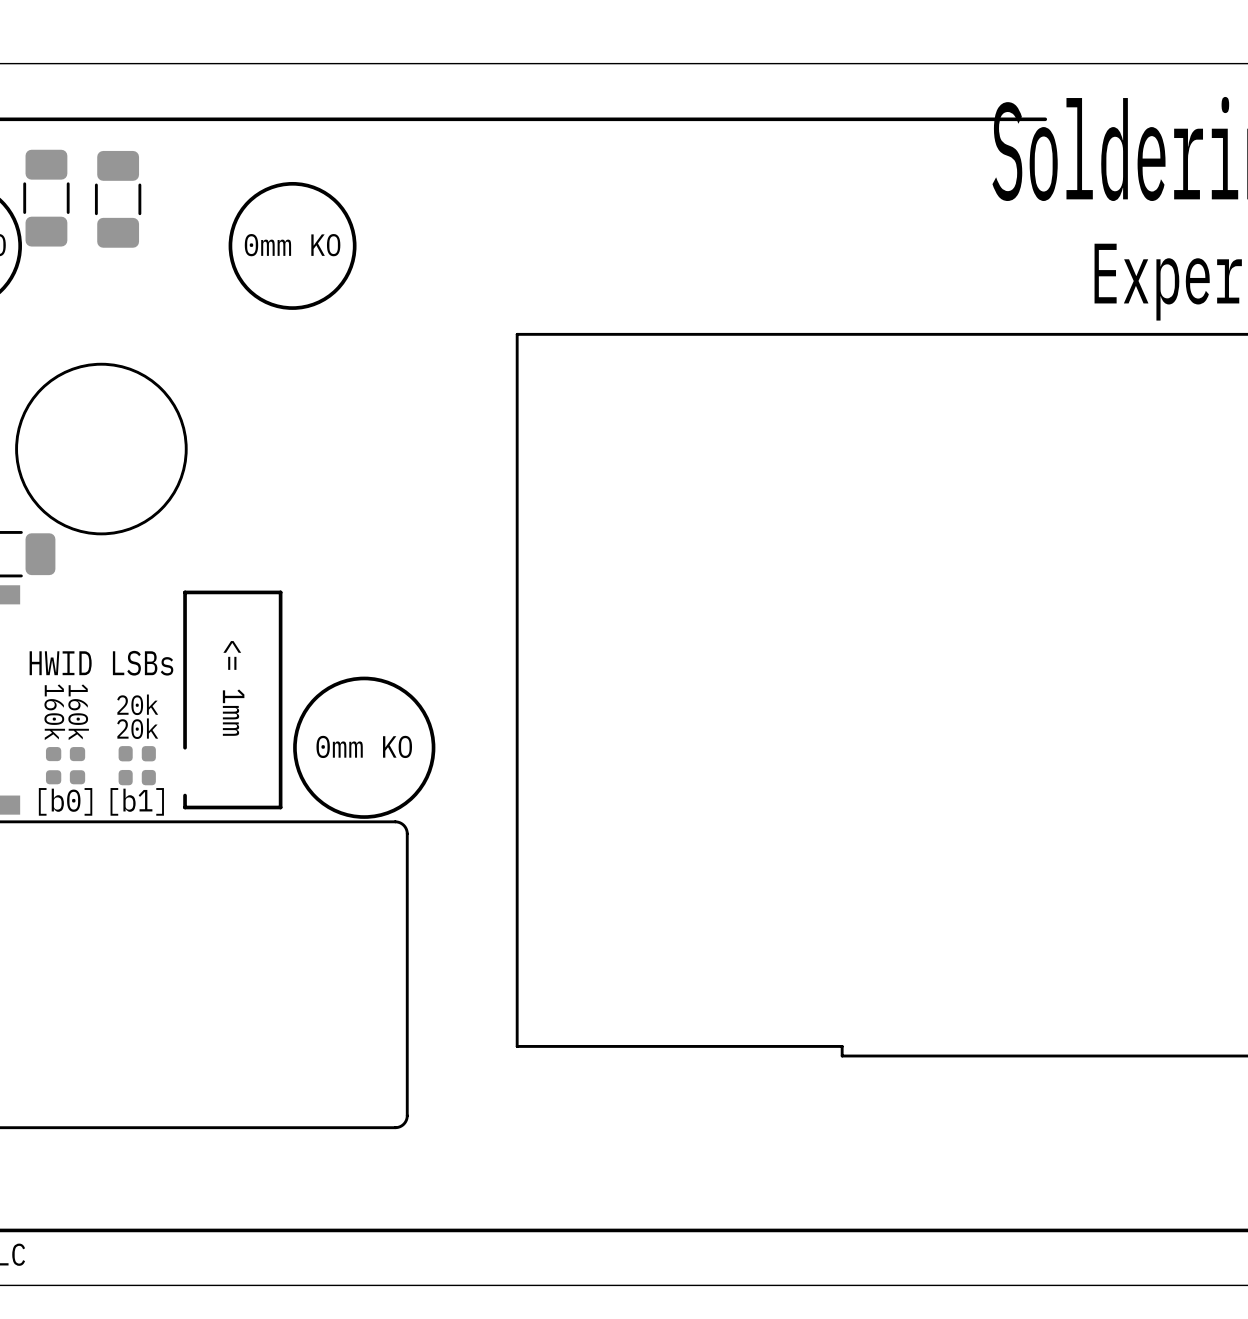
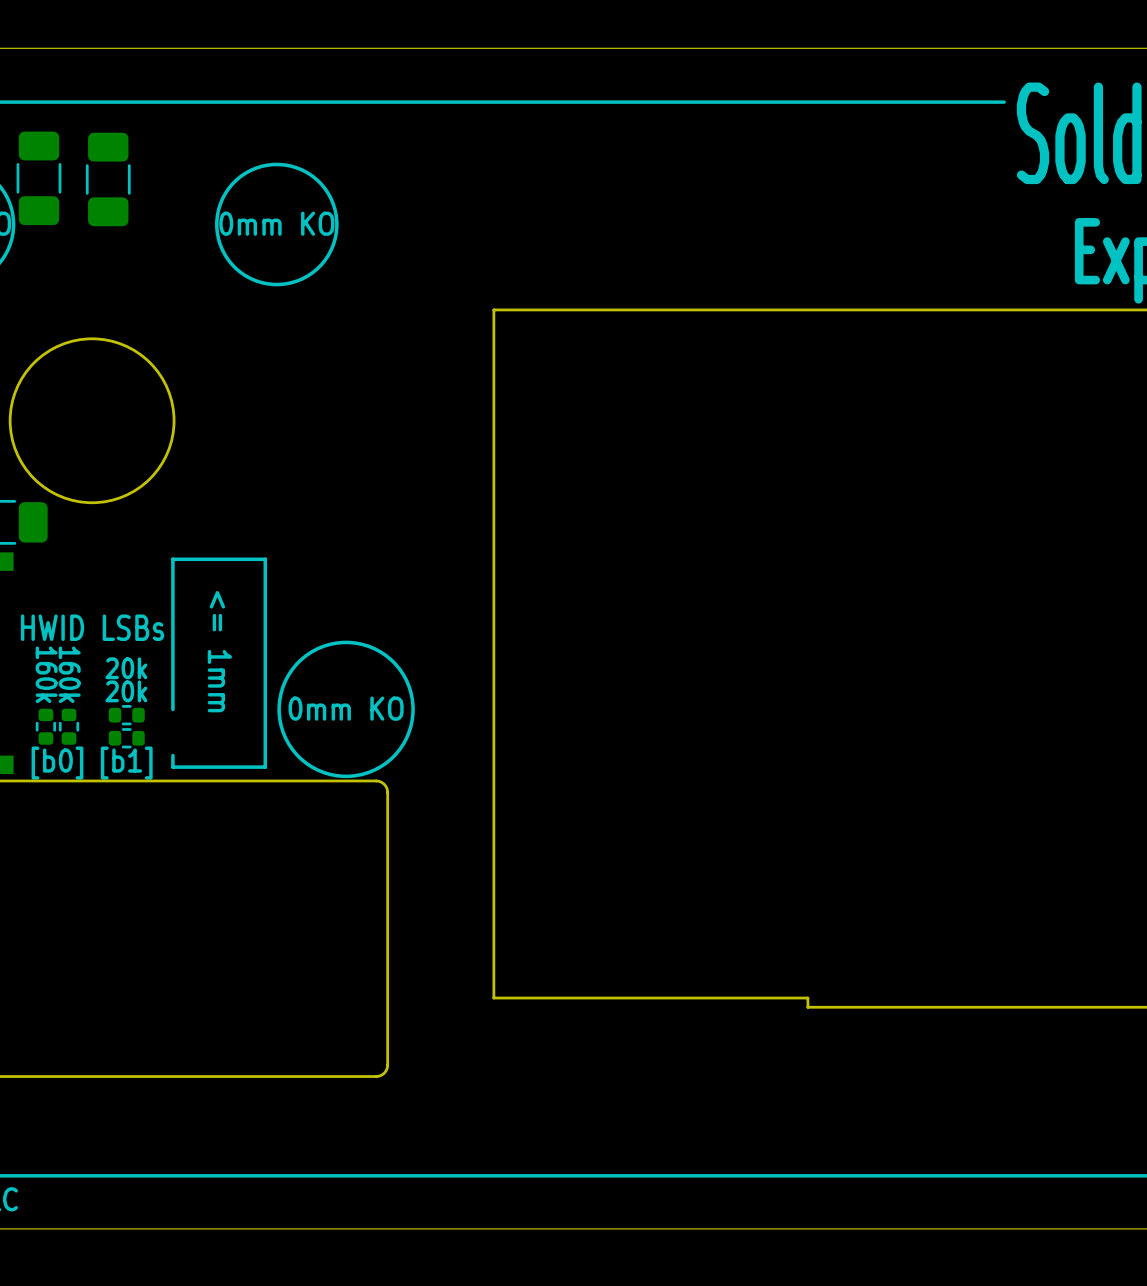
part footprint: [118, 746, 156, 762] -> [108, 705, 145, 726]
part footprint: [45, 747, 62, 785] -> [35, 708, 57, 745]
part footprint: [69, 747, 86, 785] -> [58, 708, 80, 745]
part footprint: [118, 769, 156, 786] -> [108, 728, 145, 749]

